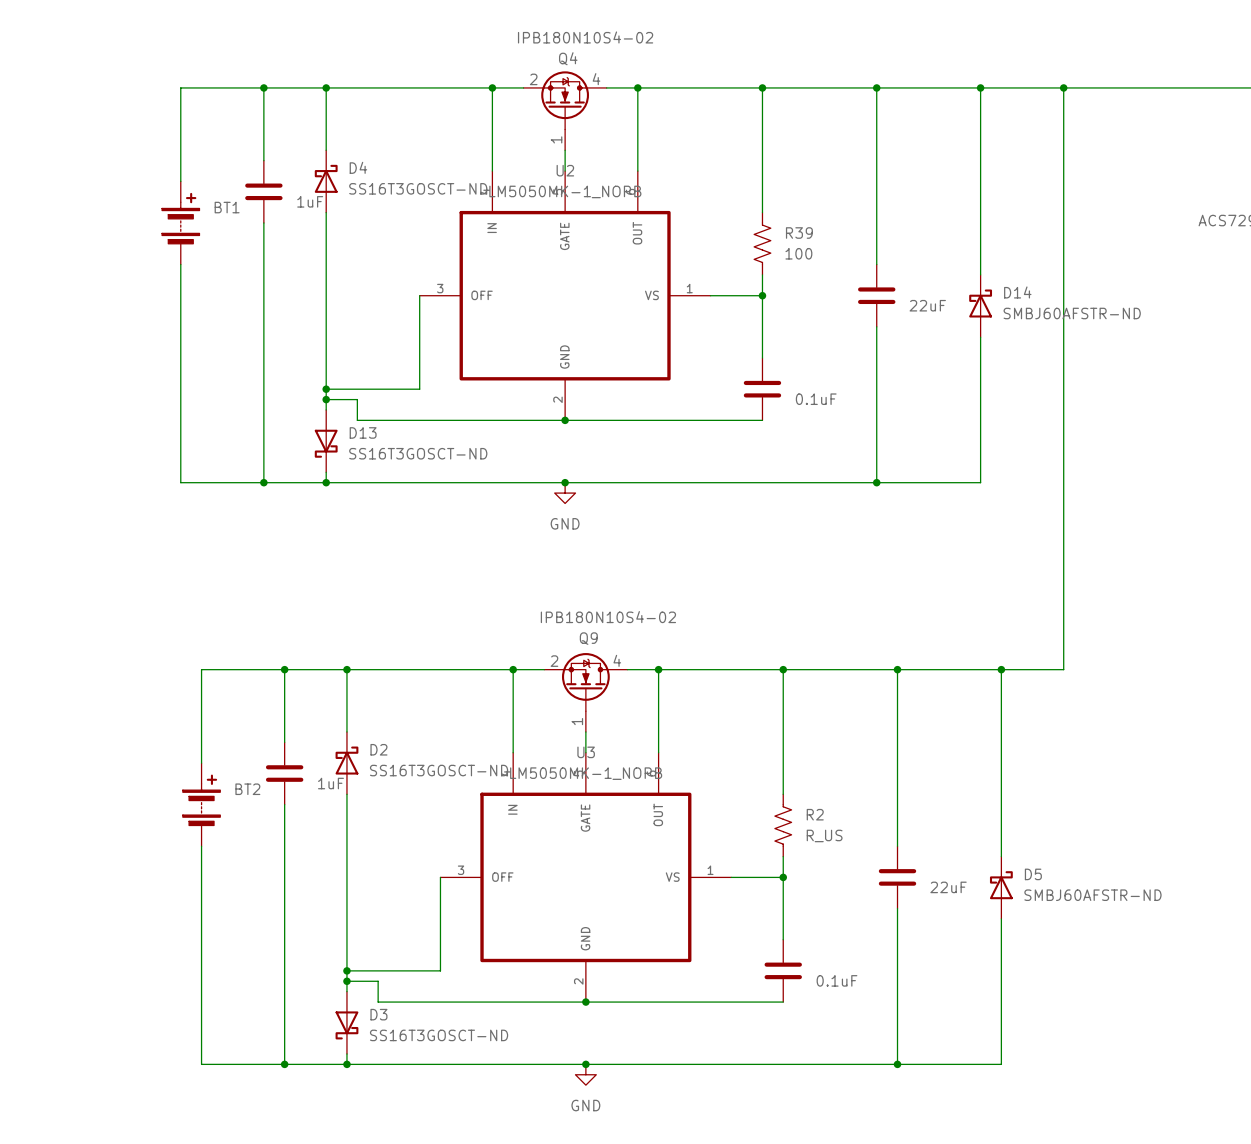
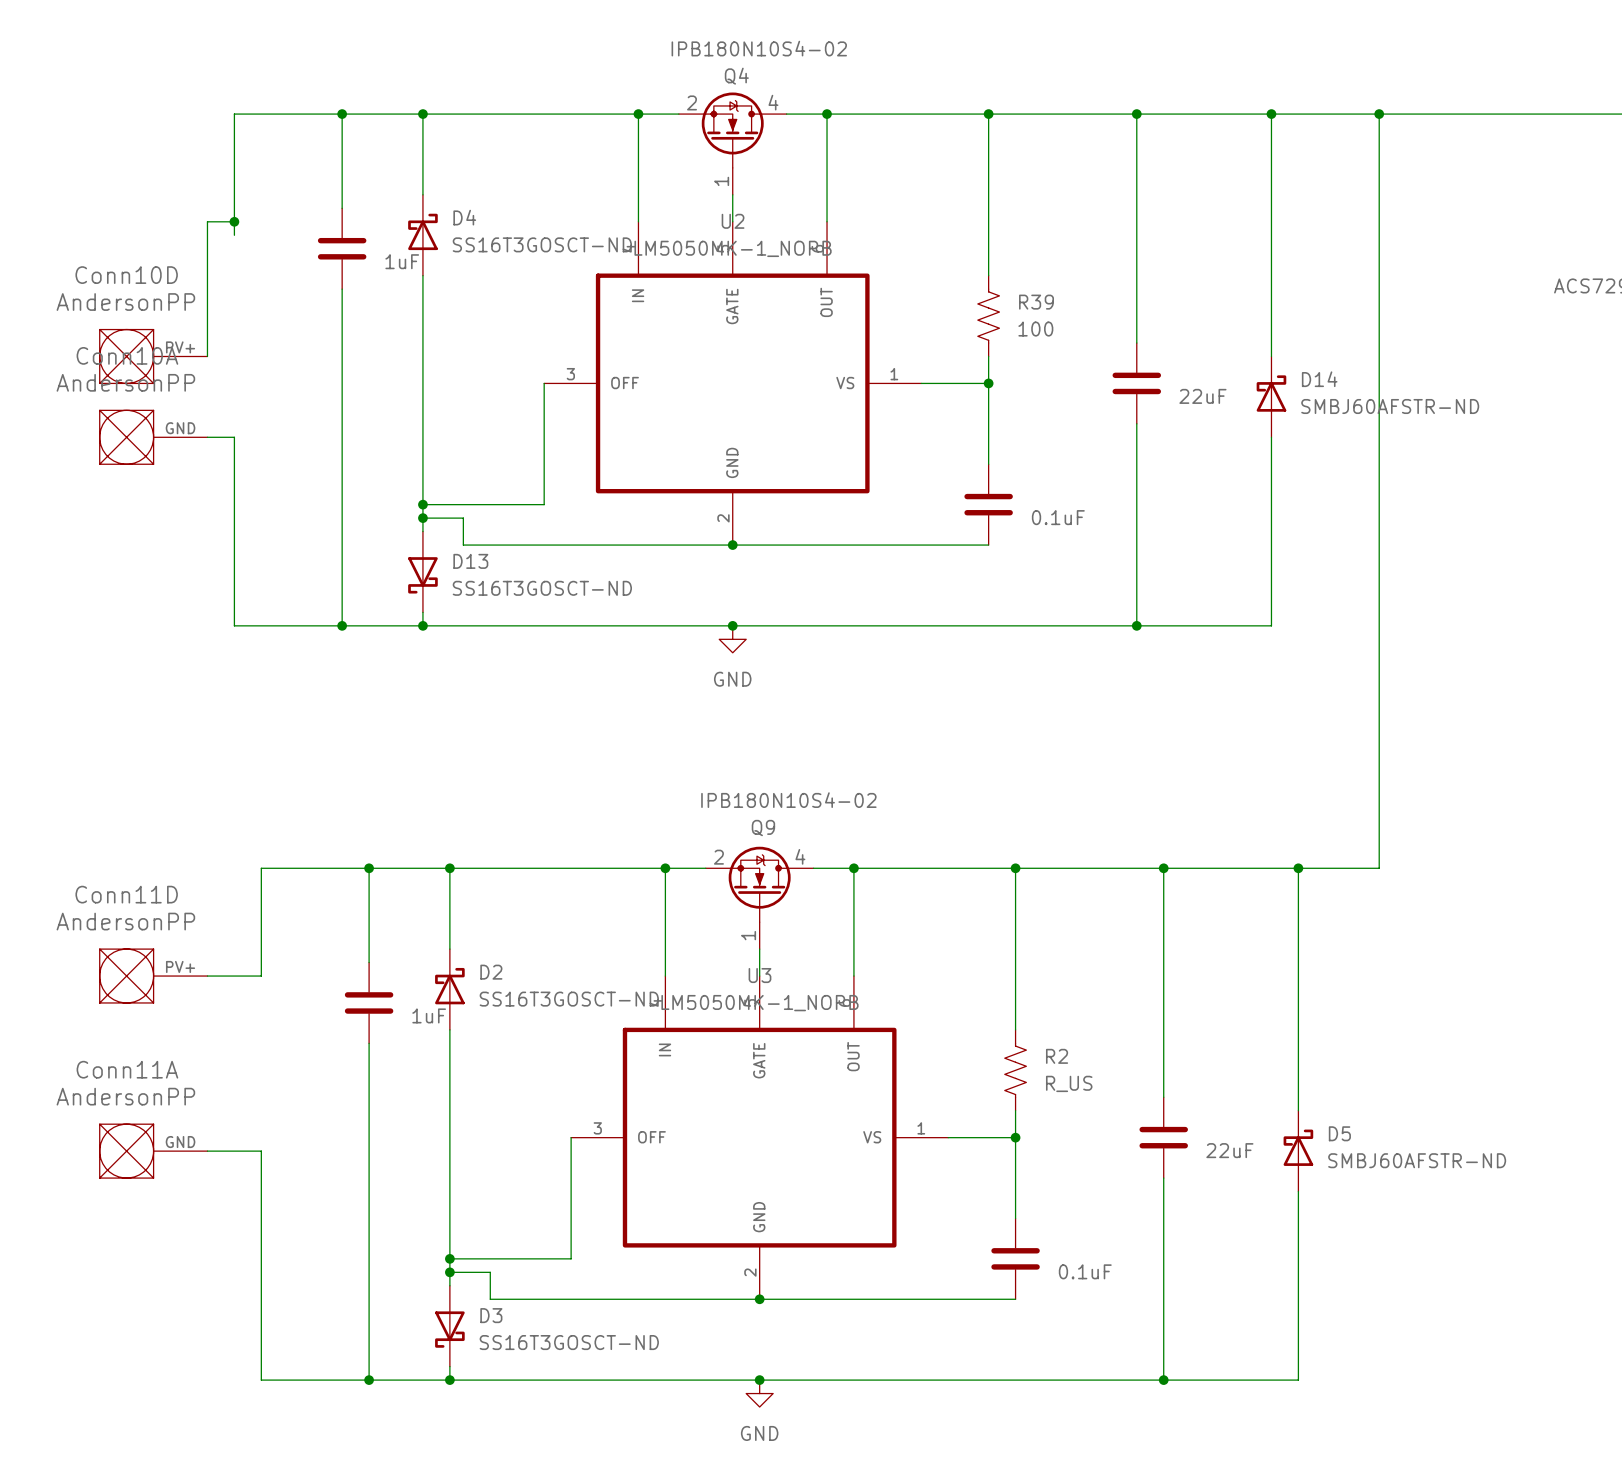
wire: none -> (234, 221) (207, 221) (207, 356)
junction: none -> (234, 221)
BT1: (180, 223) -> none
wire: (180, 264) (180, 337) -> (207, 437) (234, 437)
Conn10D: none -> AndersonPP (153, 356)
Conn10A: none -> AndersonPP (153, 437)
Conn11D: none -> AndersonPP (153, 976)
wire: (201, 752) (201, 763) -> (261, 976) (207, 976)
BT2: (201, 804) -> none
wire: (201, 846) (201, 887) -> (207, 1151) (261, 1151)
Conn11A: none -> AndersonPP (153, 1151)

